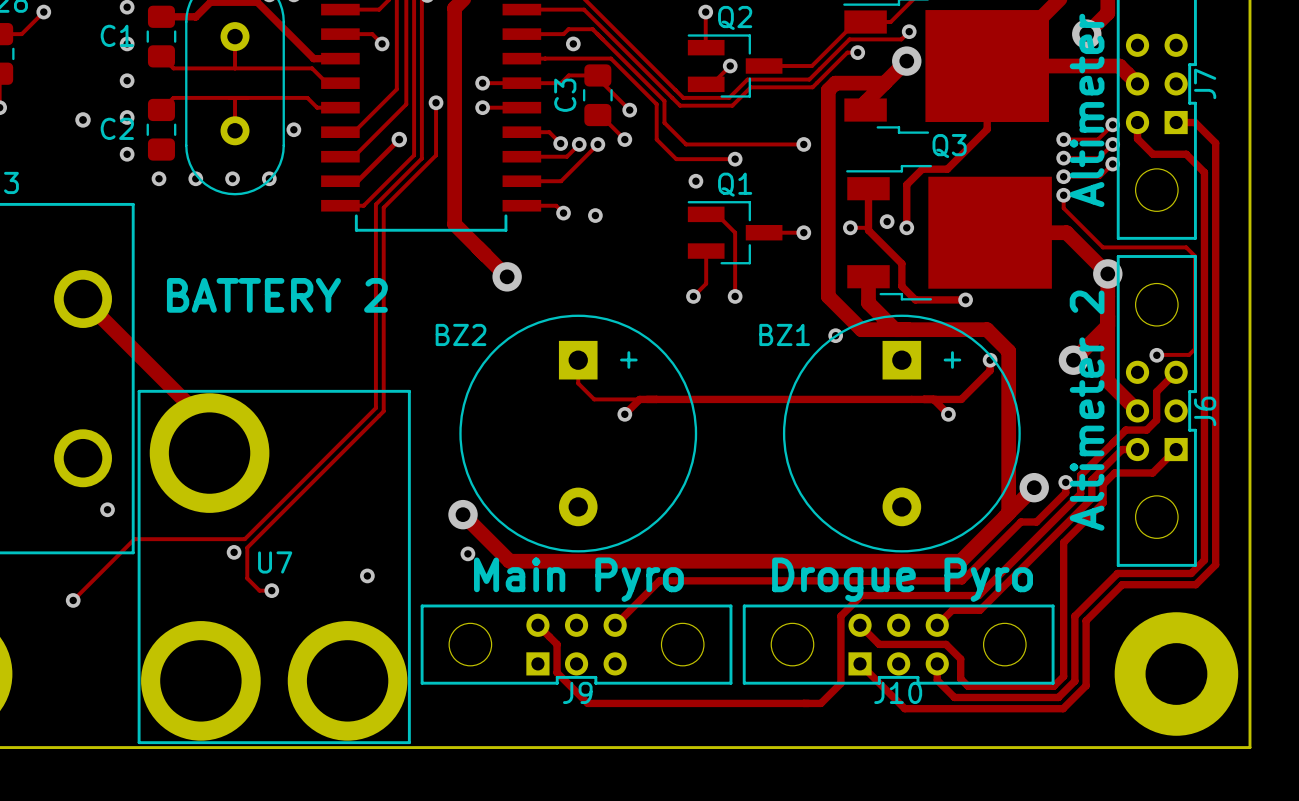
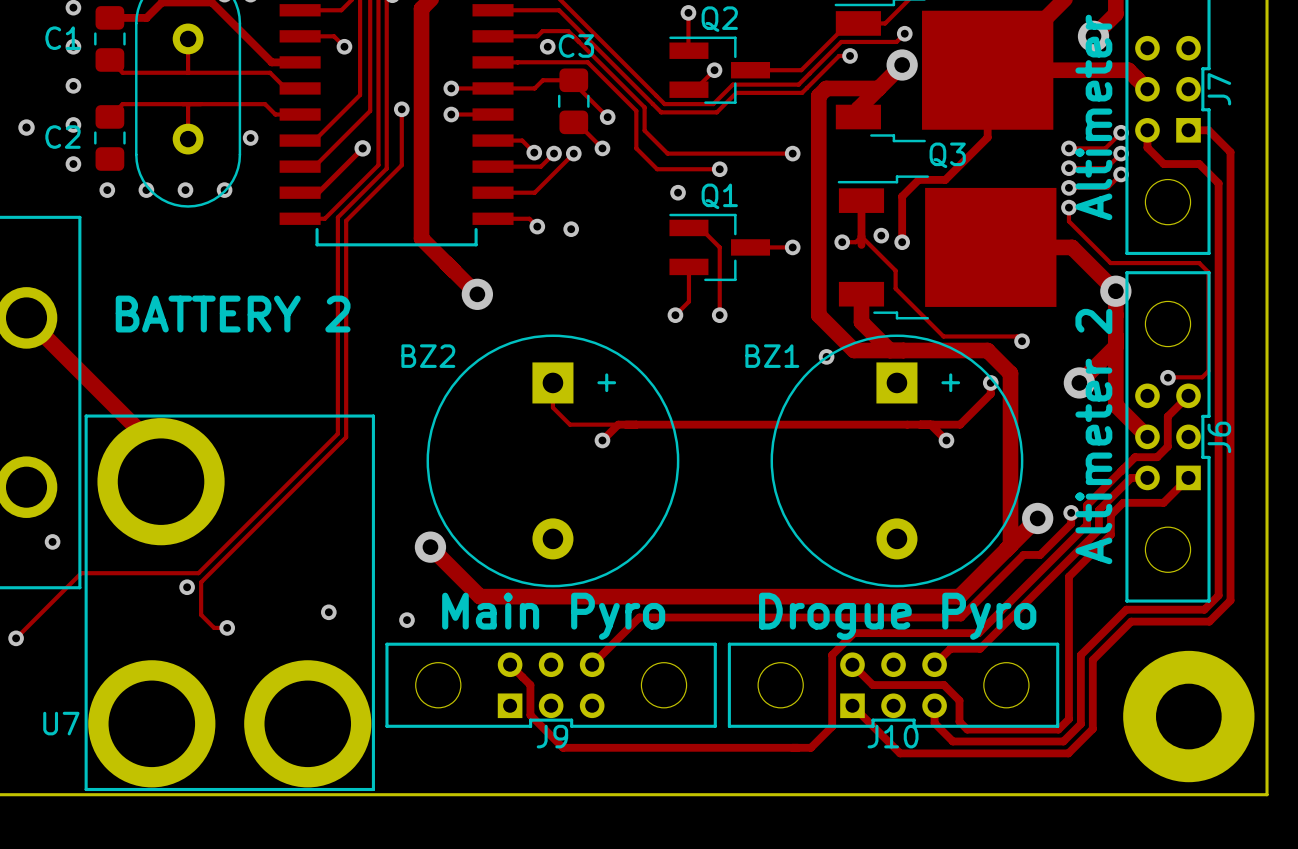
C3 name rotation: 0° (565, 95) -> 90° clockwise (576, 45)
C3 name position: C3 (565, 95) -> C3 (576, 45)
track: (863, 227) (865, 227) (901, 263) (901, 286) (915, 299) (965, 299) -> (855, 242) (861, 236) (895, 270) (895, 288) (943, 336) (1017, 336) (1022, 341)
via position: (965, 299) -> (1022, 341)
via position: (467, 553) -> (407, 620)
U7 name position: U7 (275, 562) -> U7 (61, 723)

